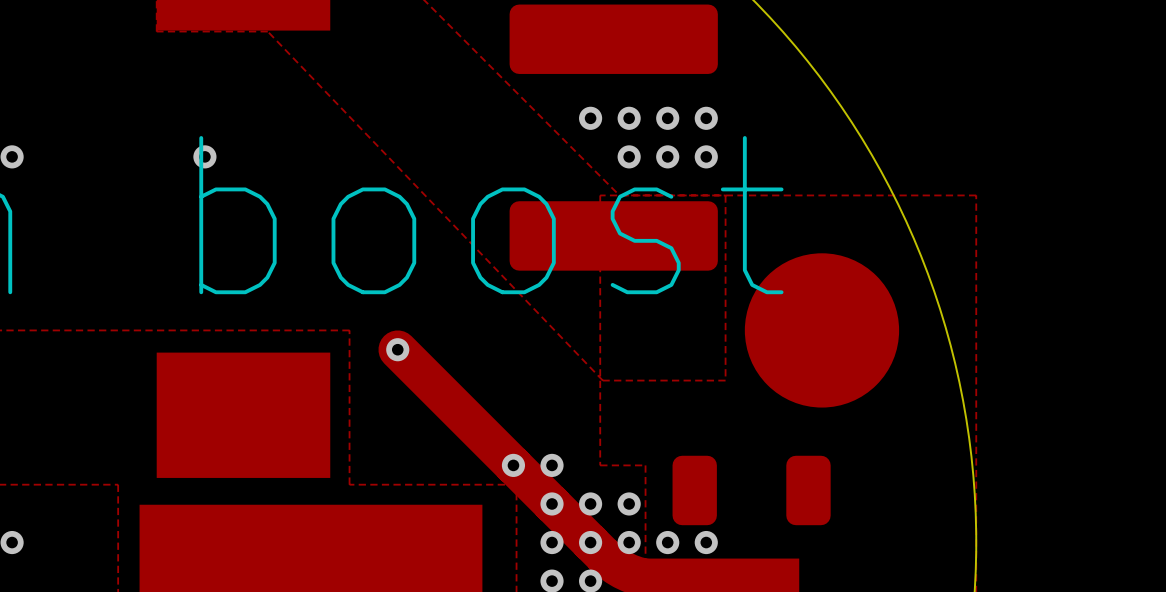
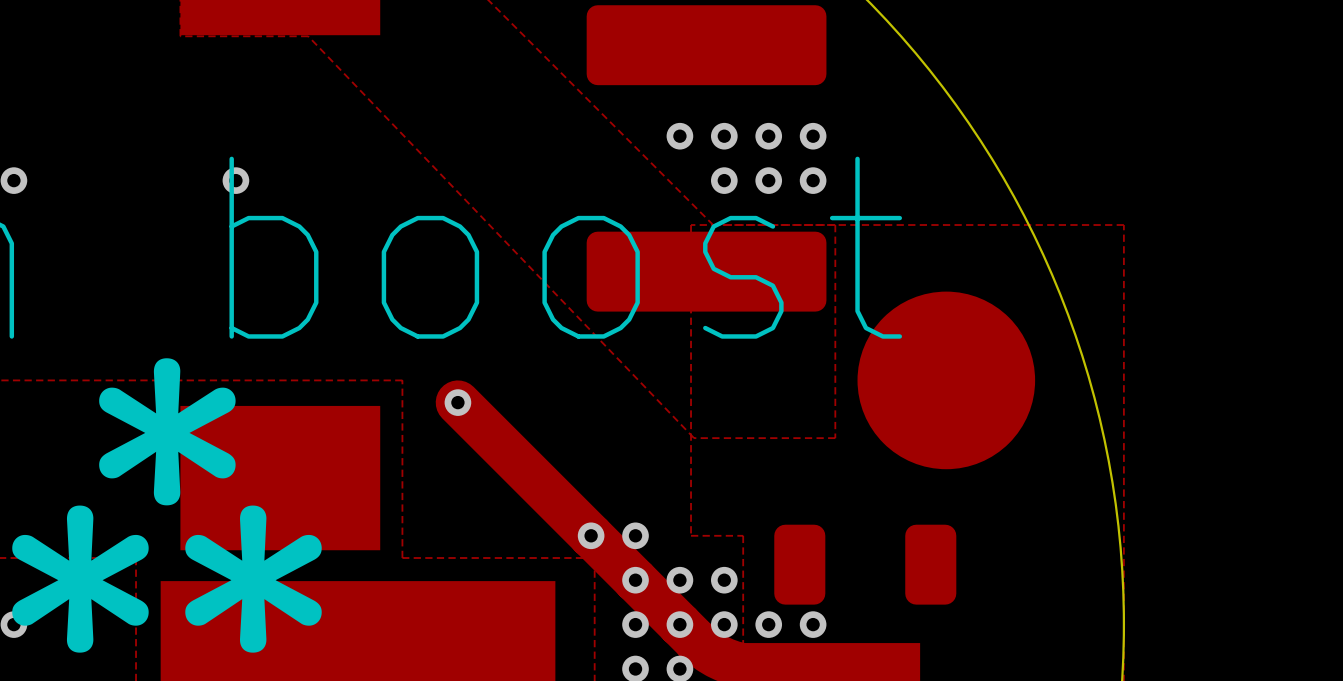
drawing: none -> [12, 358, 322, 653]

